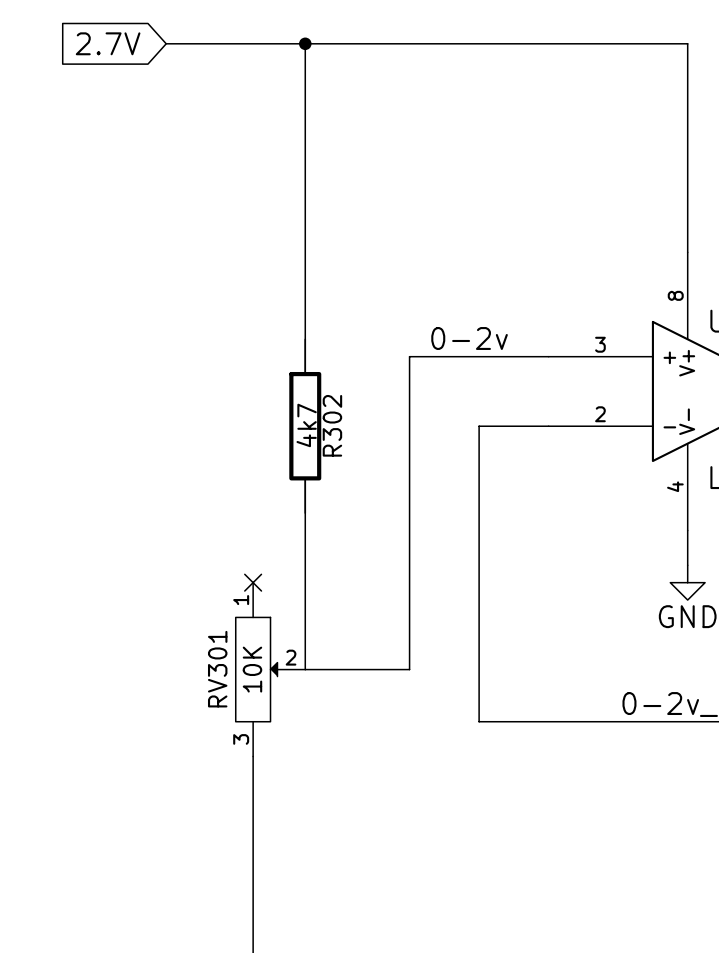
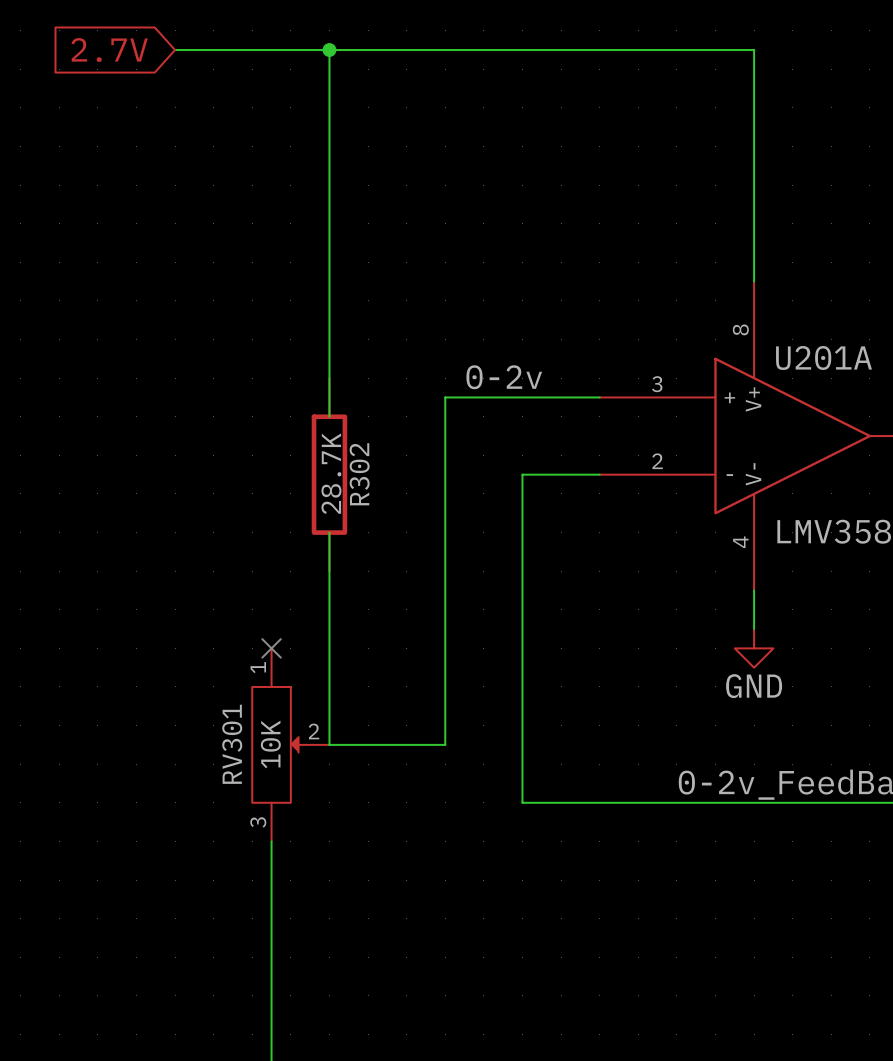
R302 value: 4k7 (306, 425) -> 28.7K (331, 473)

